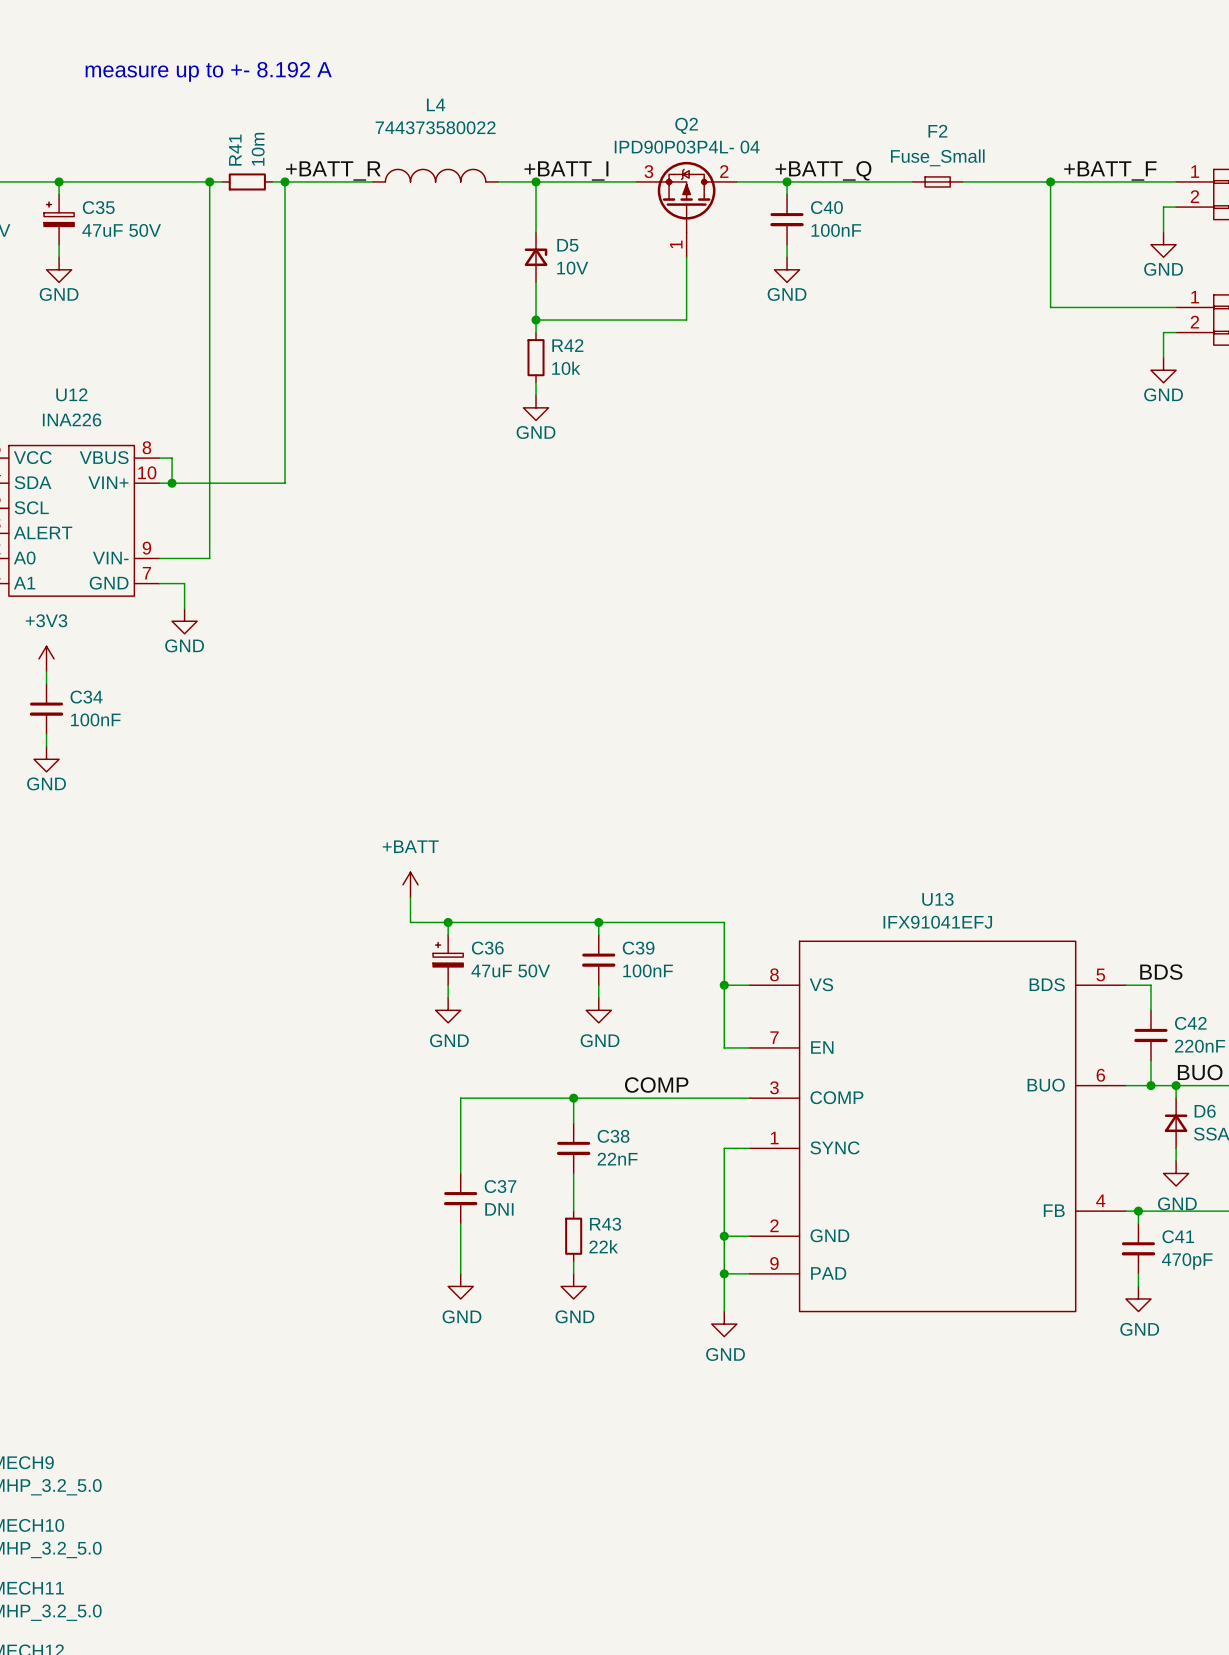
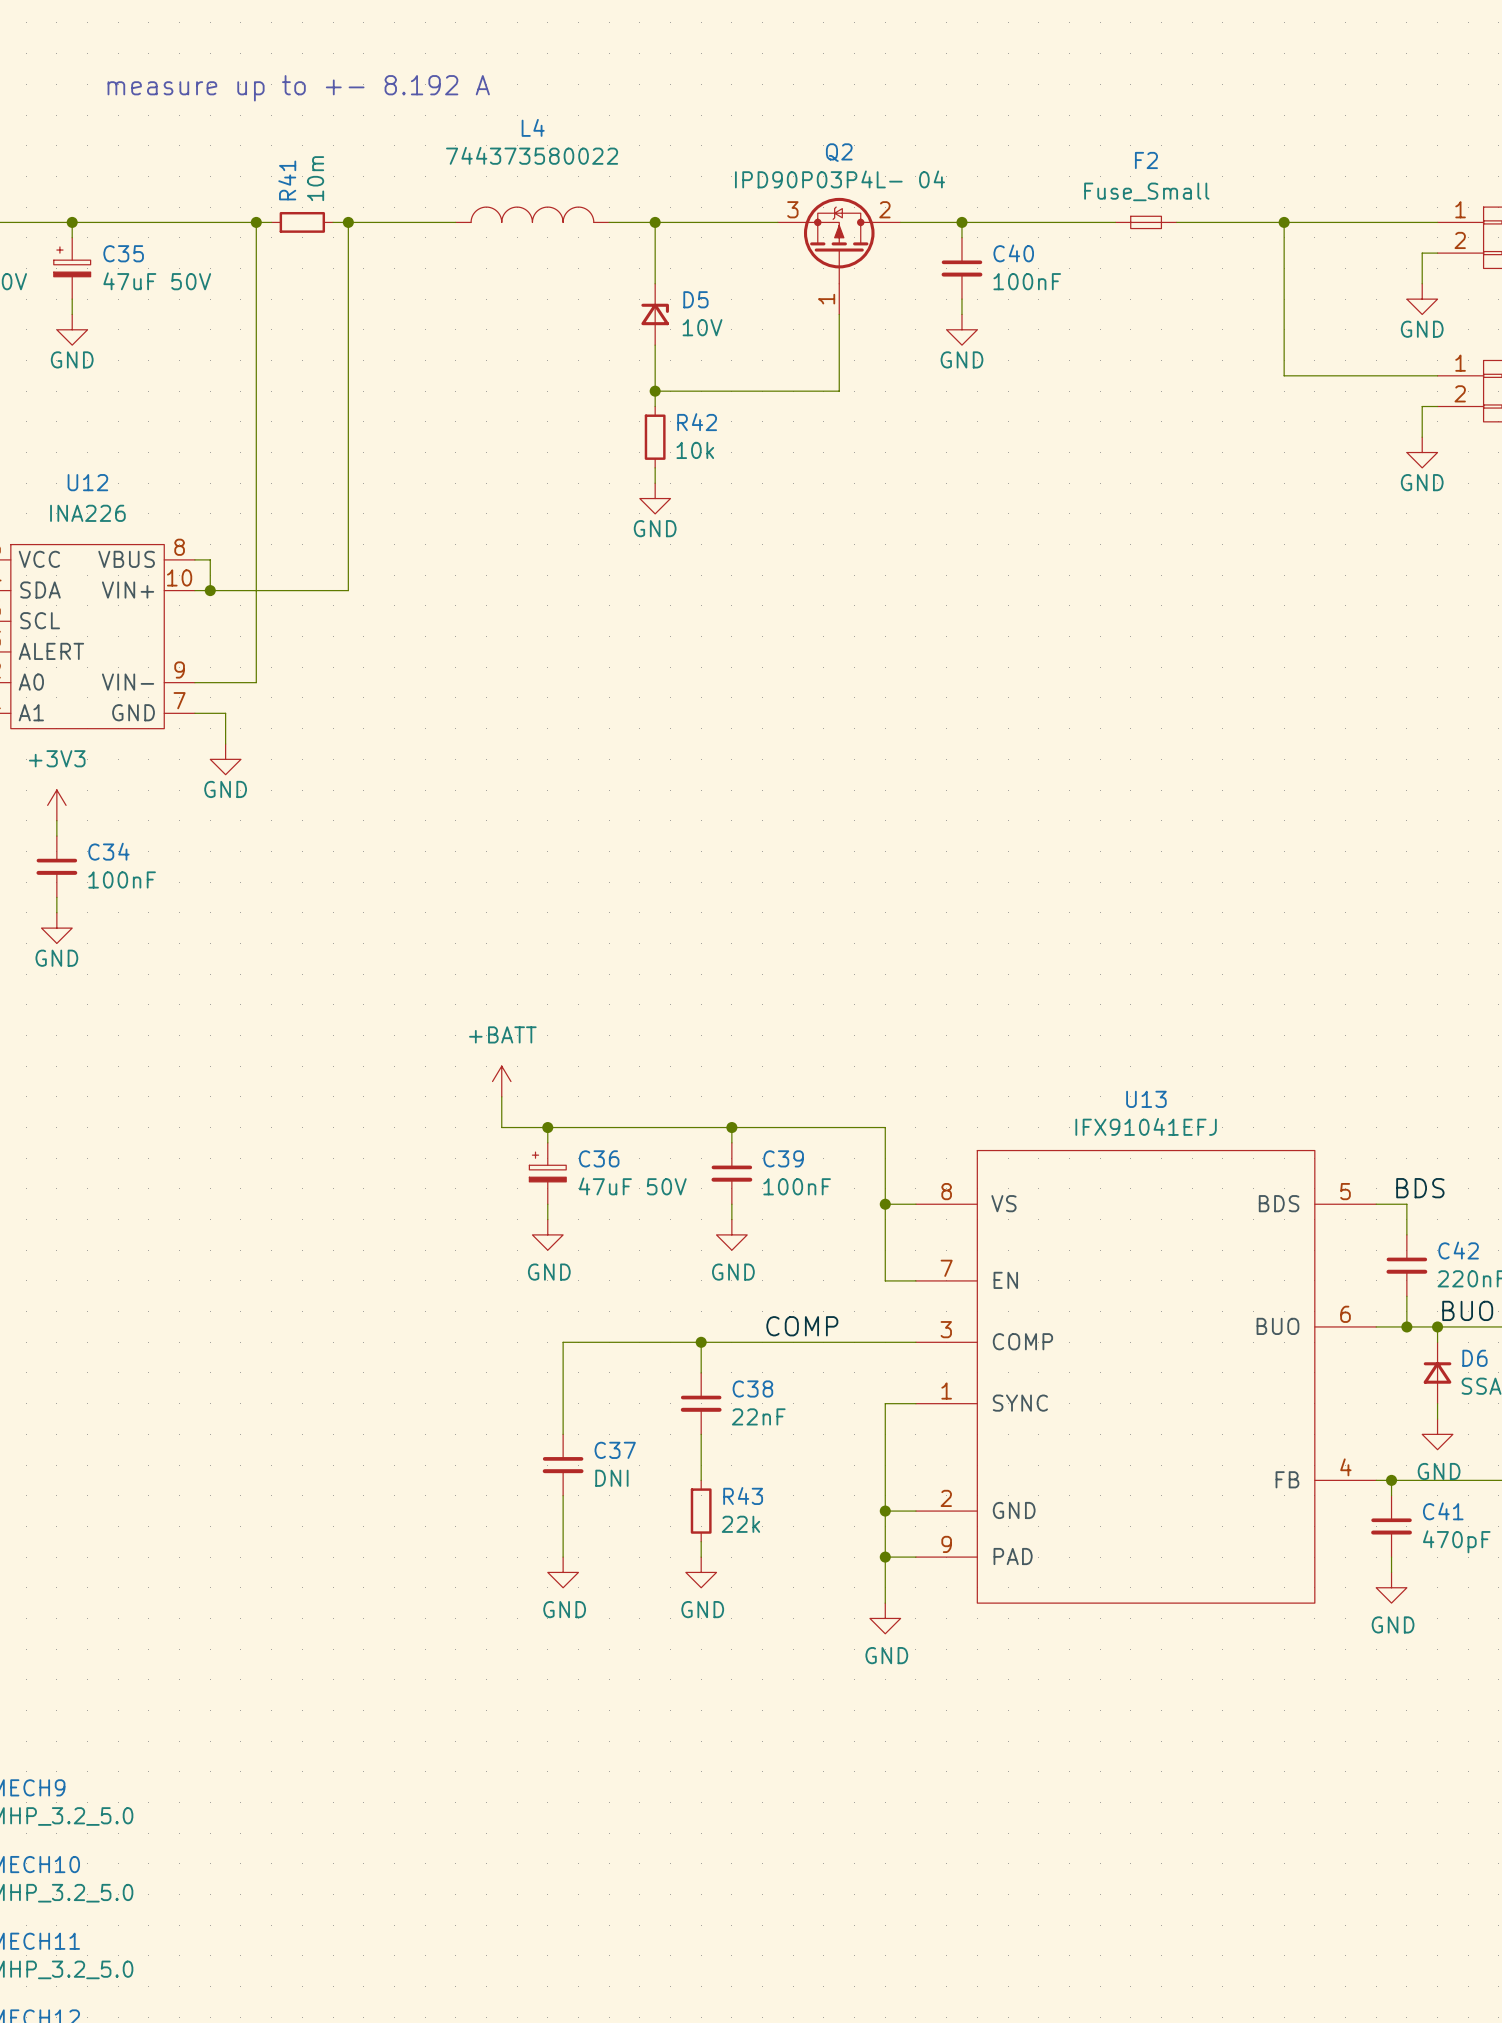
label: +BATT_Q (823, 170) -> none
label: +BATT_R (333, 171) -> none
label: +BATT_I (566, 171) -> none
label: +BATT_F (1110, 171) -> none

